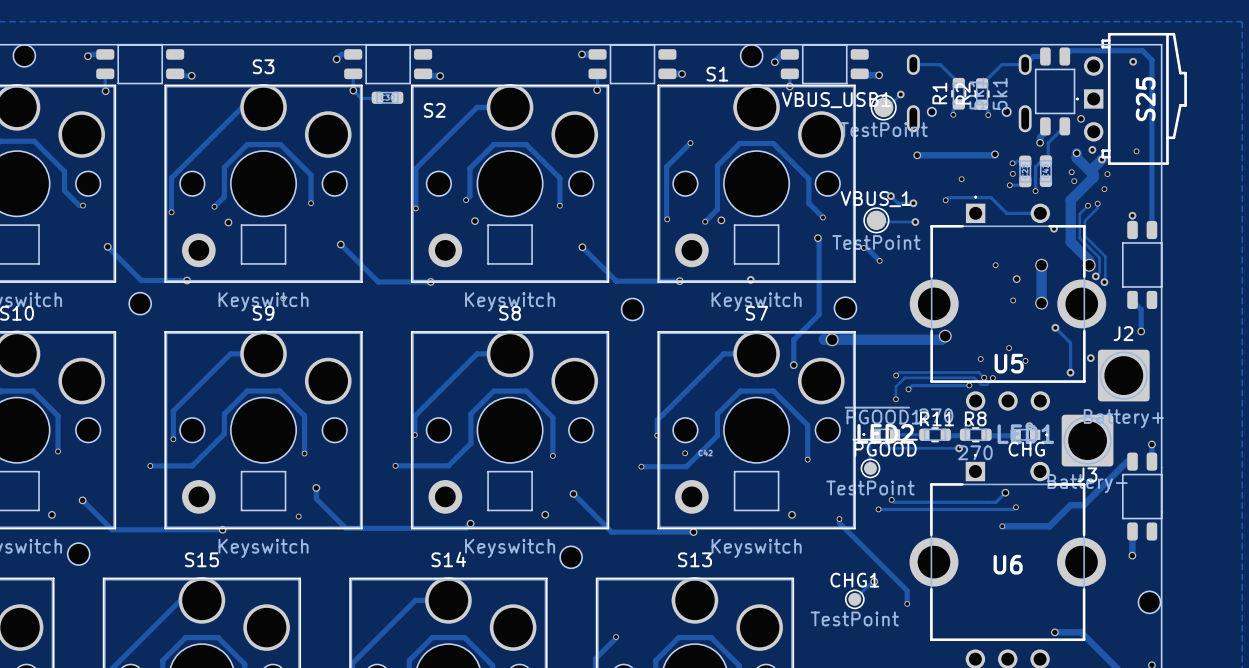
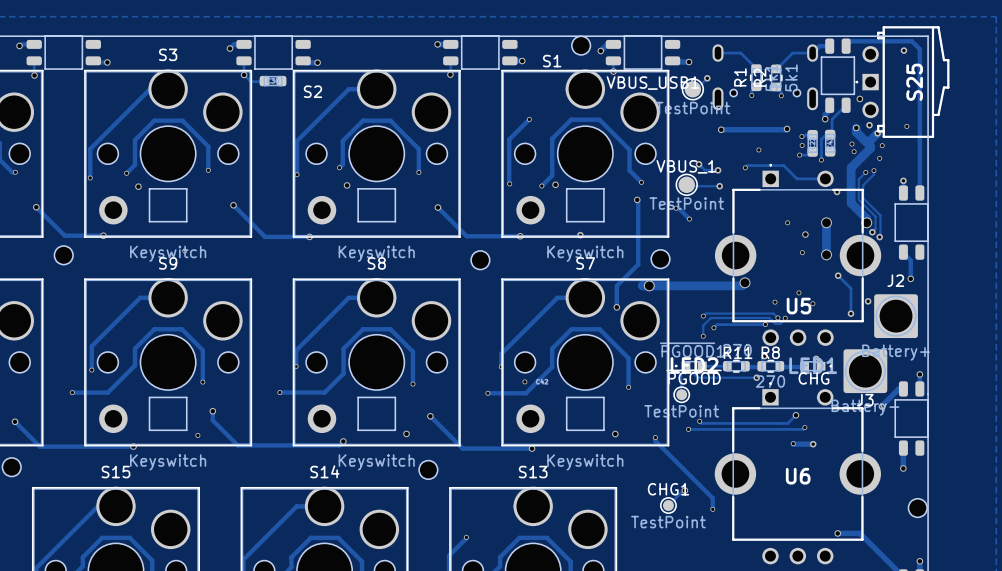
track: (1107, 481) (1083, 505) (1070, 505) (1049, 526) (1002, 526) -> (813, 444) (793, 443)
via: none -> (881, 406)
via: none -> (813, 444)

